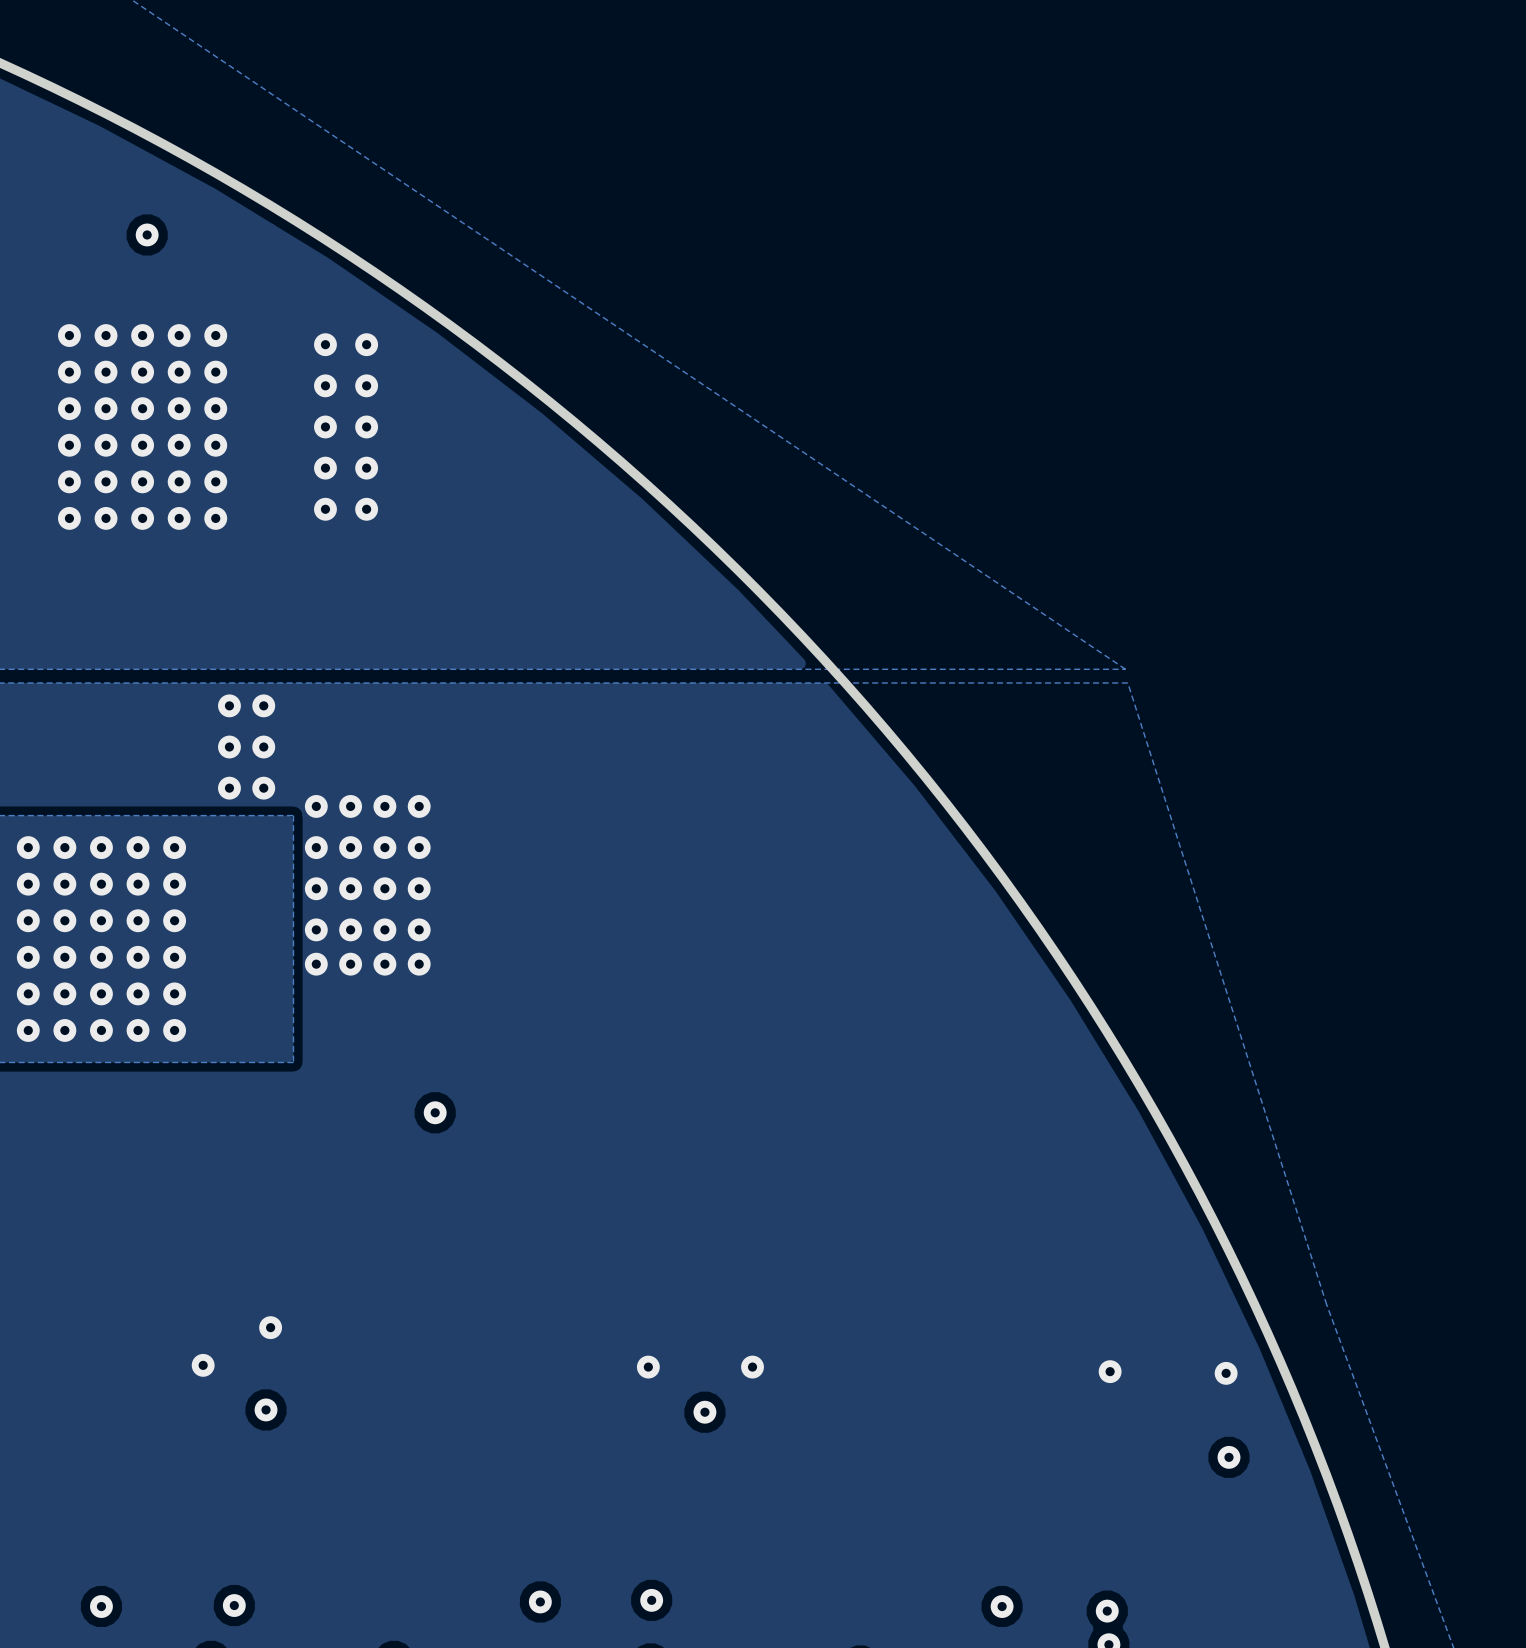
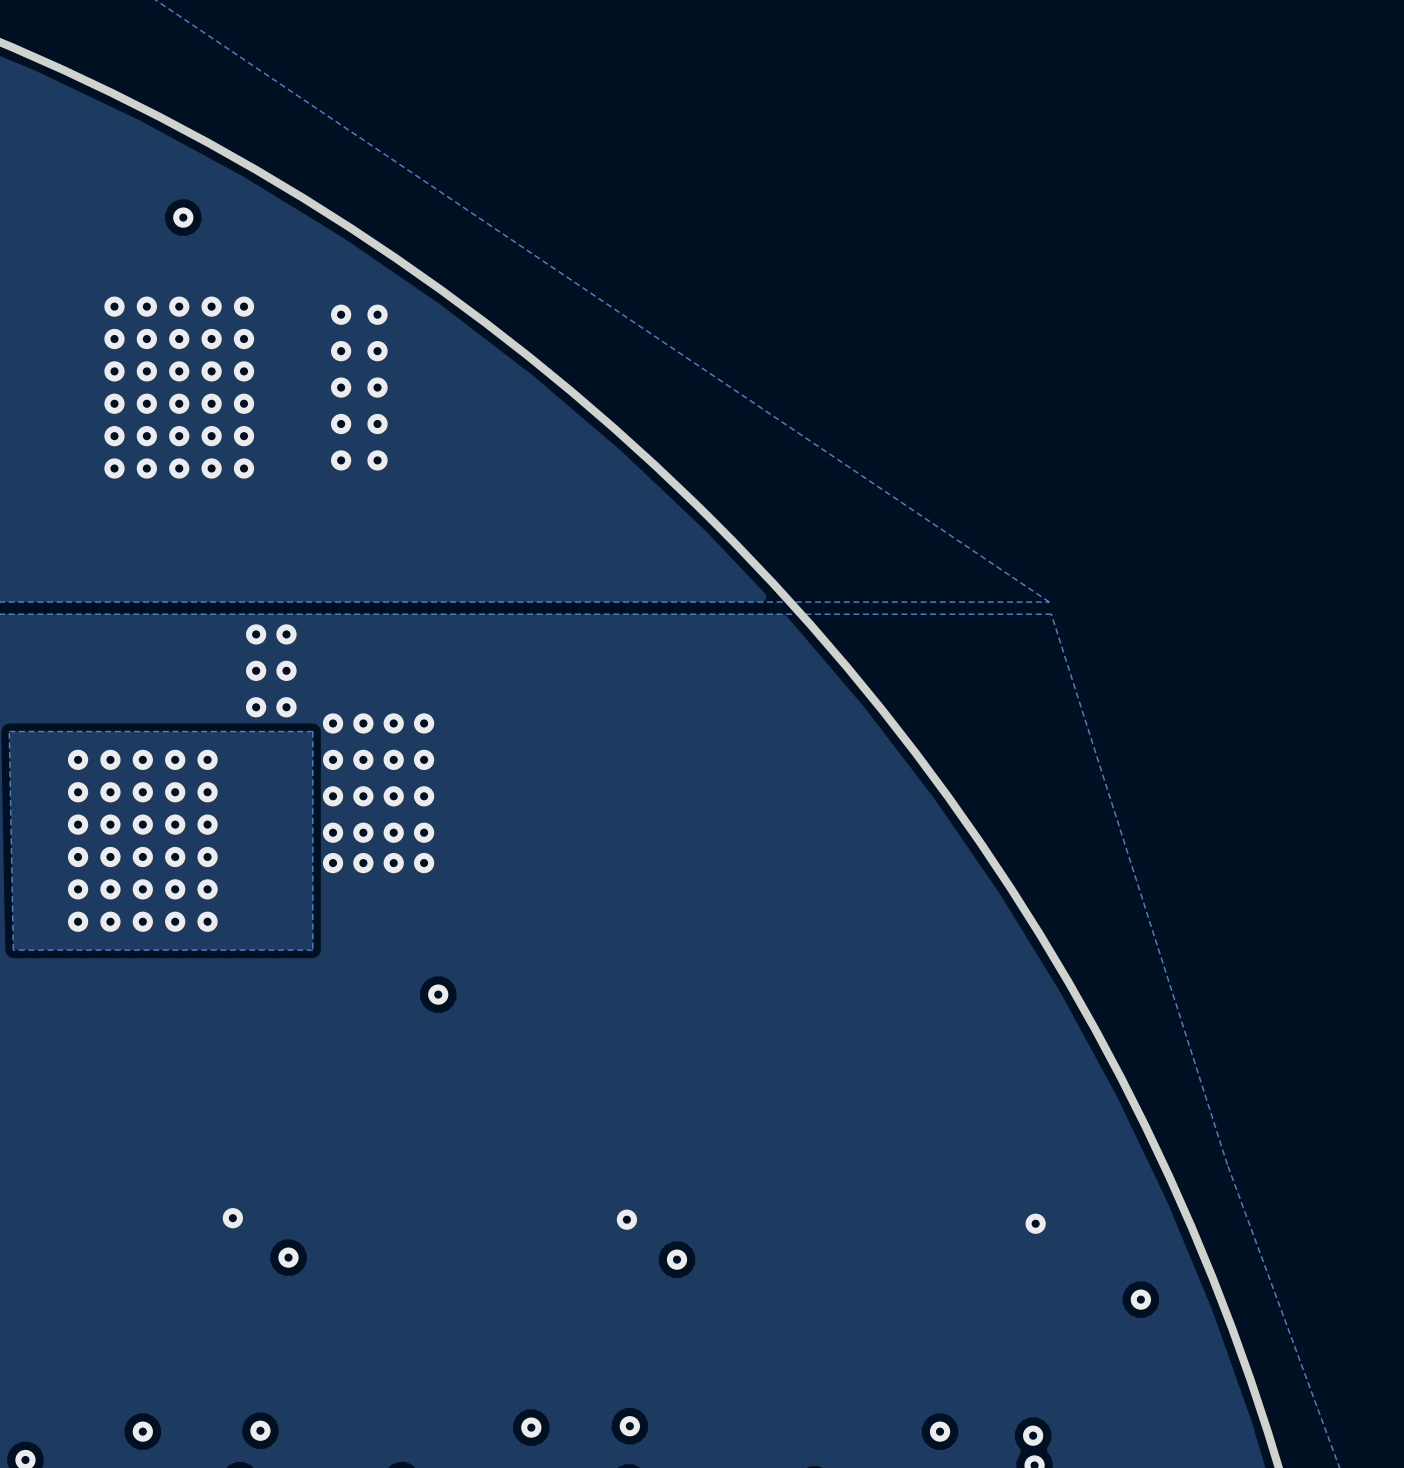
via: (270, 1327) -> none
via: (752, 1367) -> none
via: (1226, 1373) -> none

